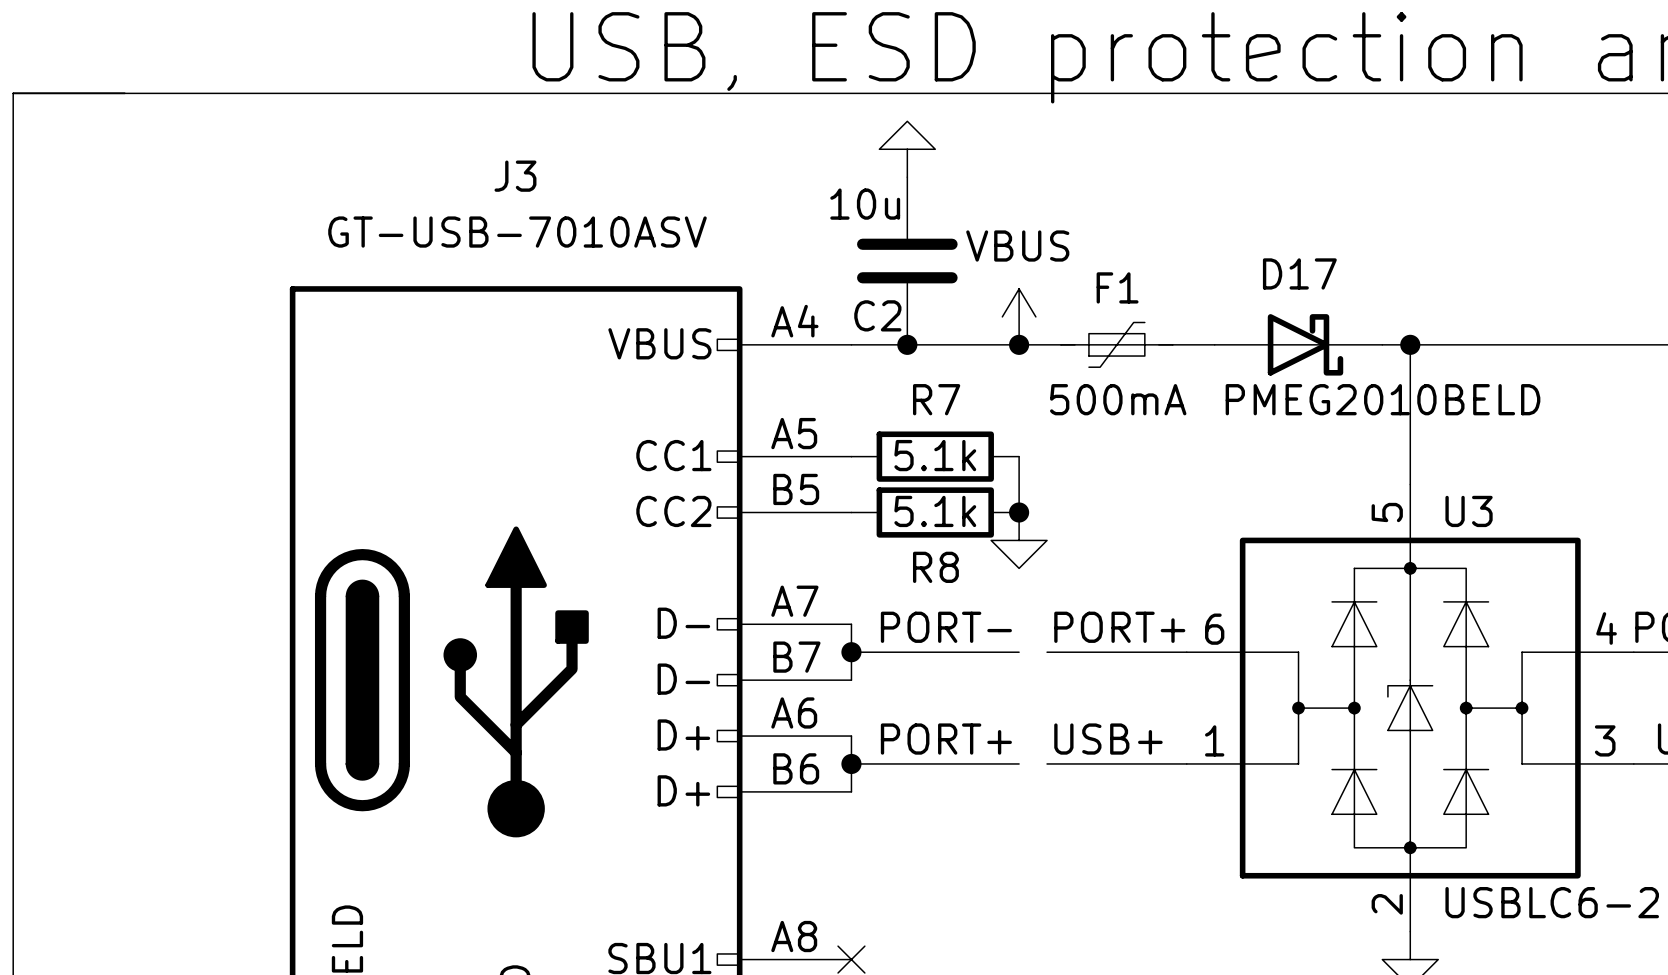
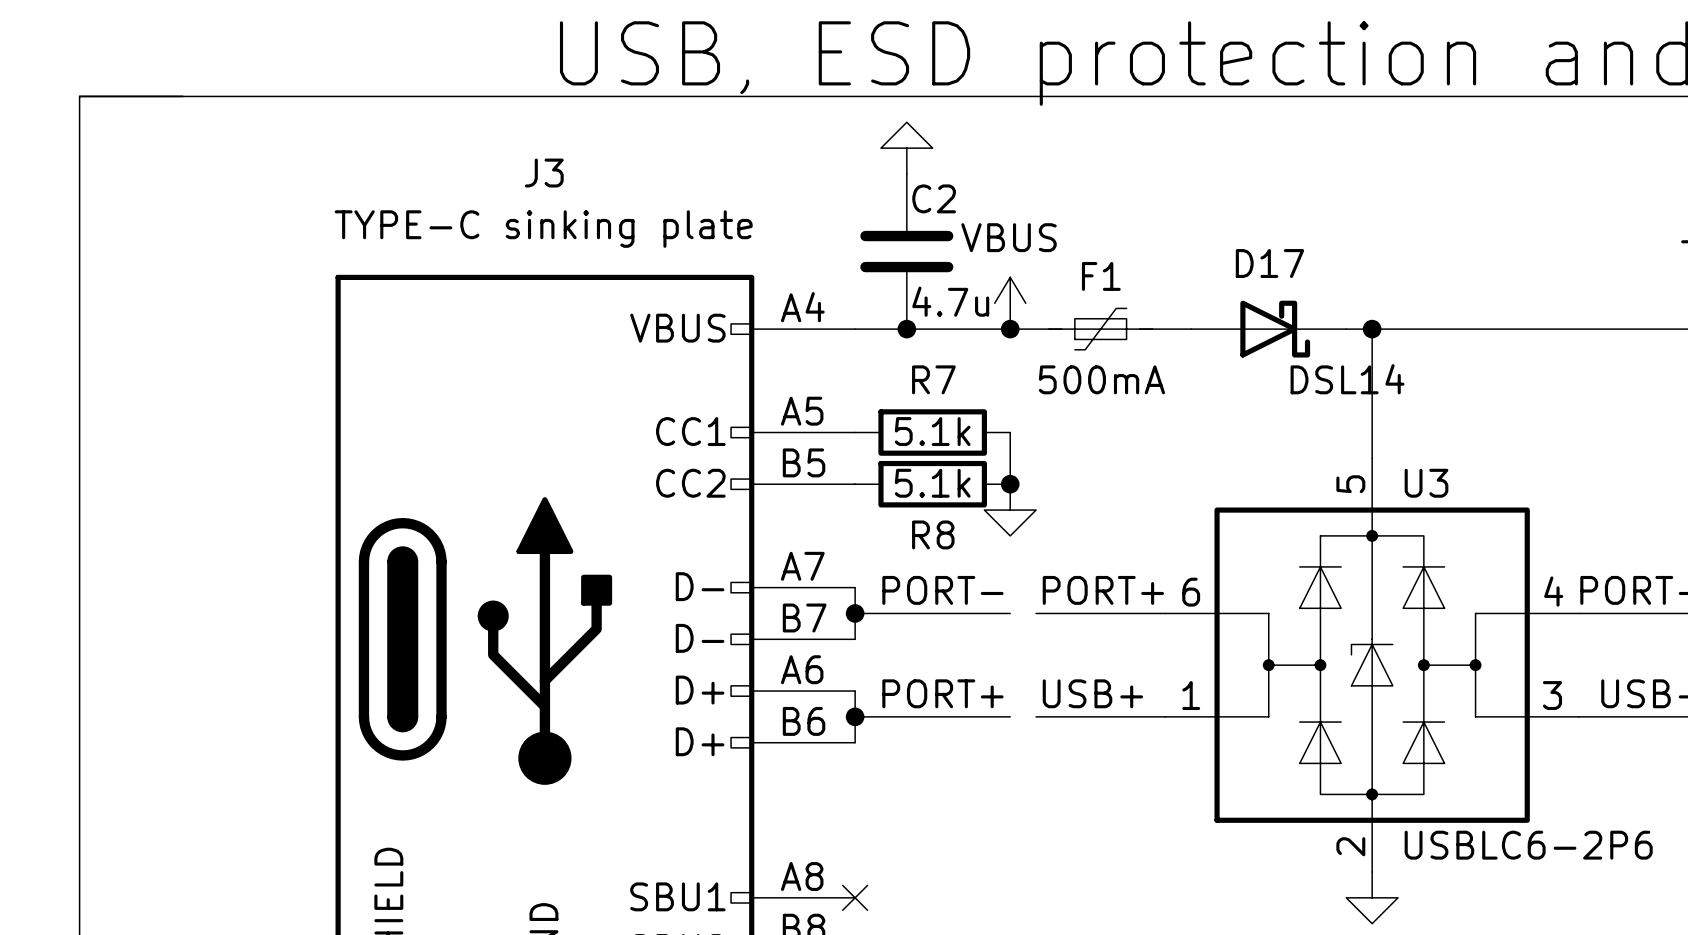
C2 value: 10u (865, 204) -> 4.7u (950, 301)
J3 value: GT-USB-7010ASV (517, 232) -> TYPE-C sinking plate (543, 229)
C2 name position: C2 (877, 315) -> C2 (934, 198)
D17 value: PMEG2010BELD (1383, 399) -> DSL14 (1347, 379)

